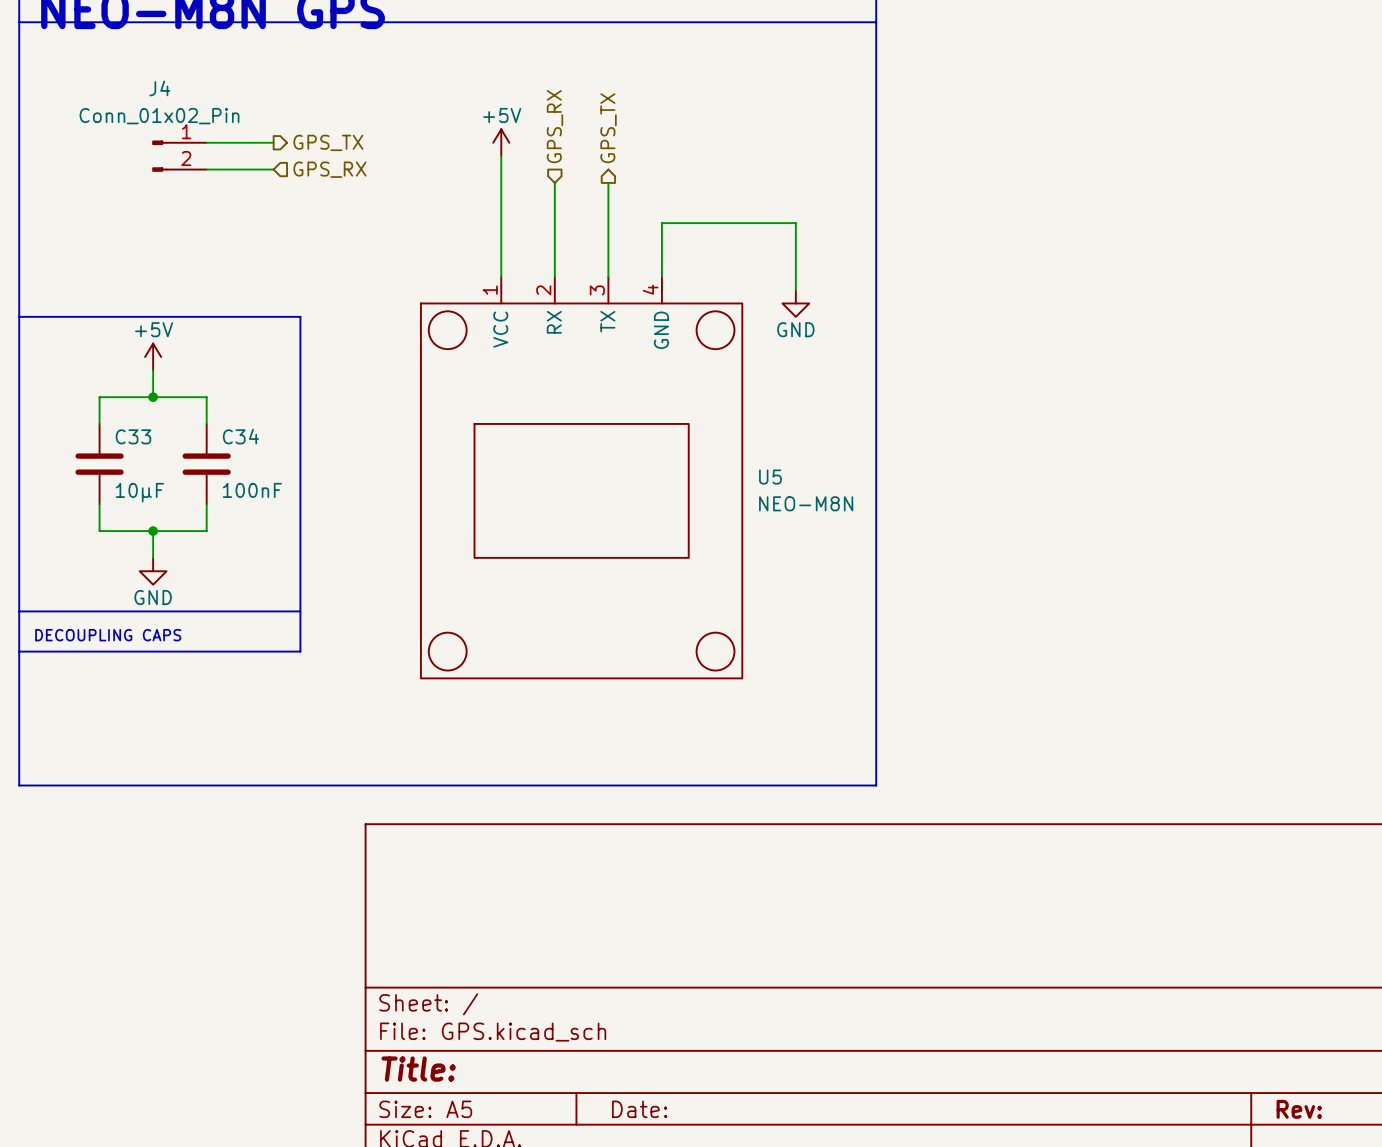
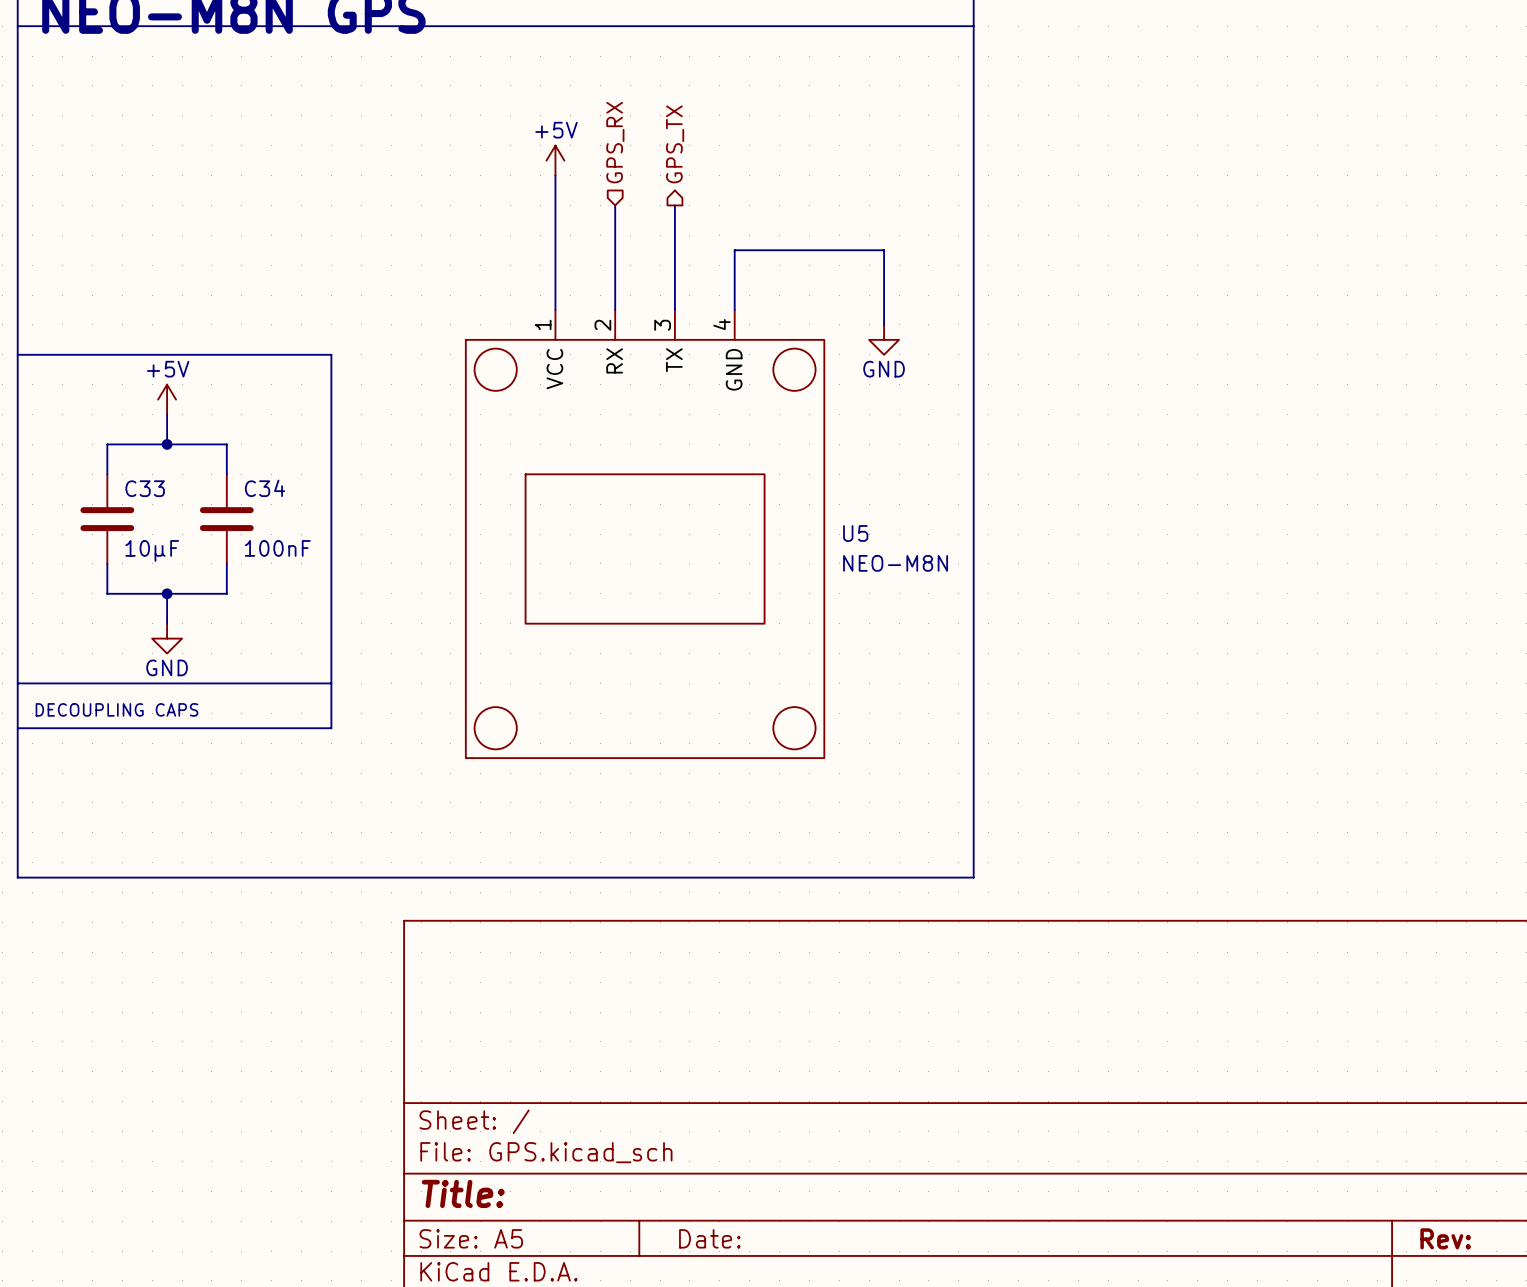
wire: (206, 142) (273, 142) -> none
hierarchical label: GPS_TX (328, 142) -> none
J4: Conn_01x02_Pin (179, 156) -> none
wire: (206, 169) (273, 169) -> none
hierarchical label: GPS_RX (329, 169) -> none

